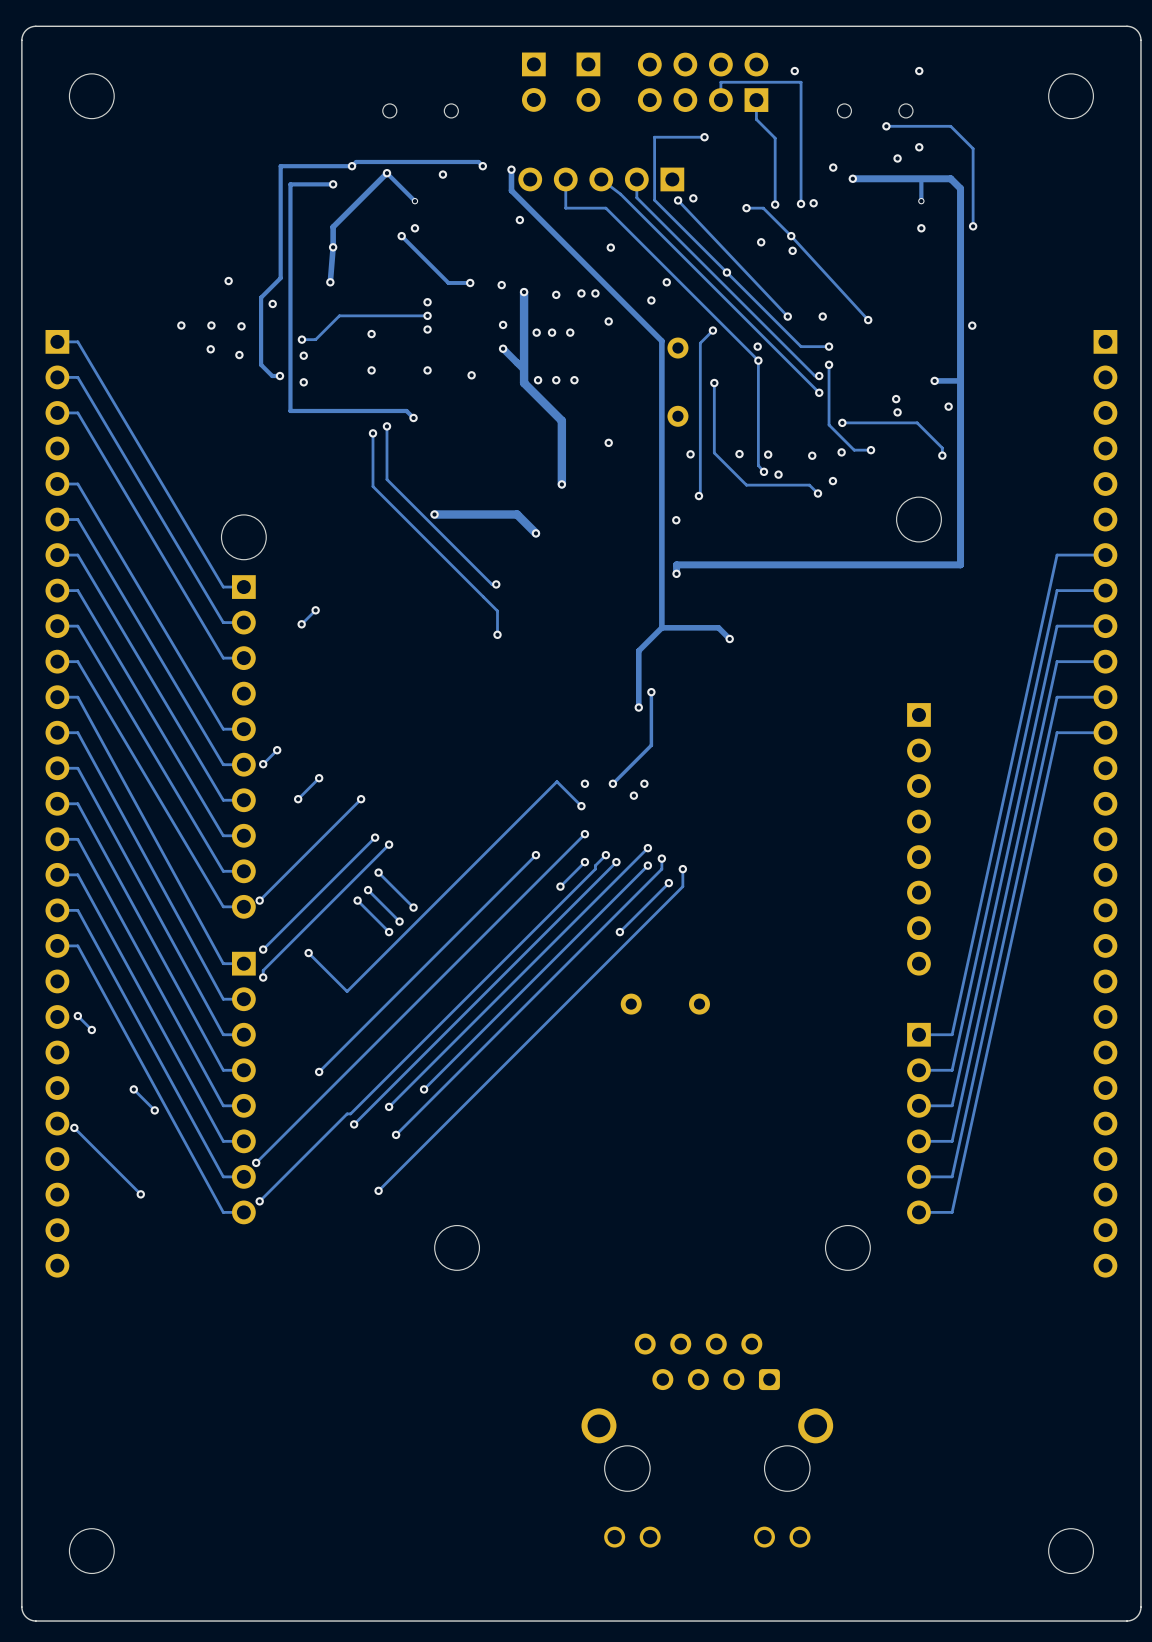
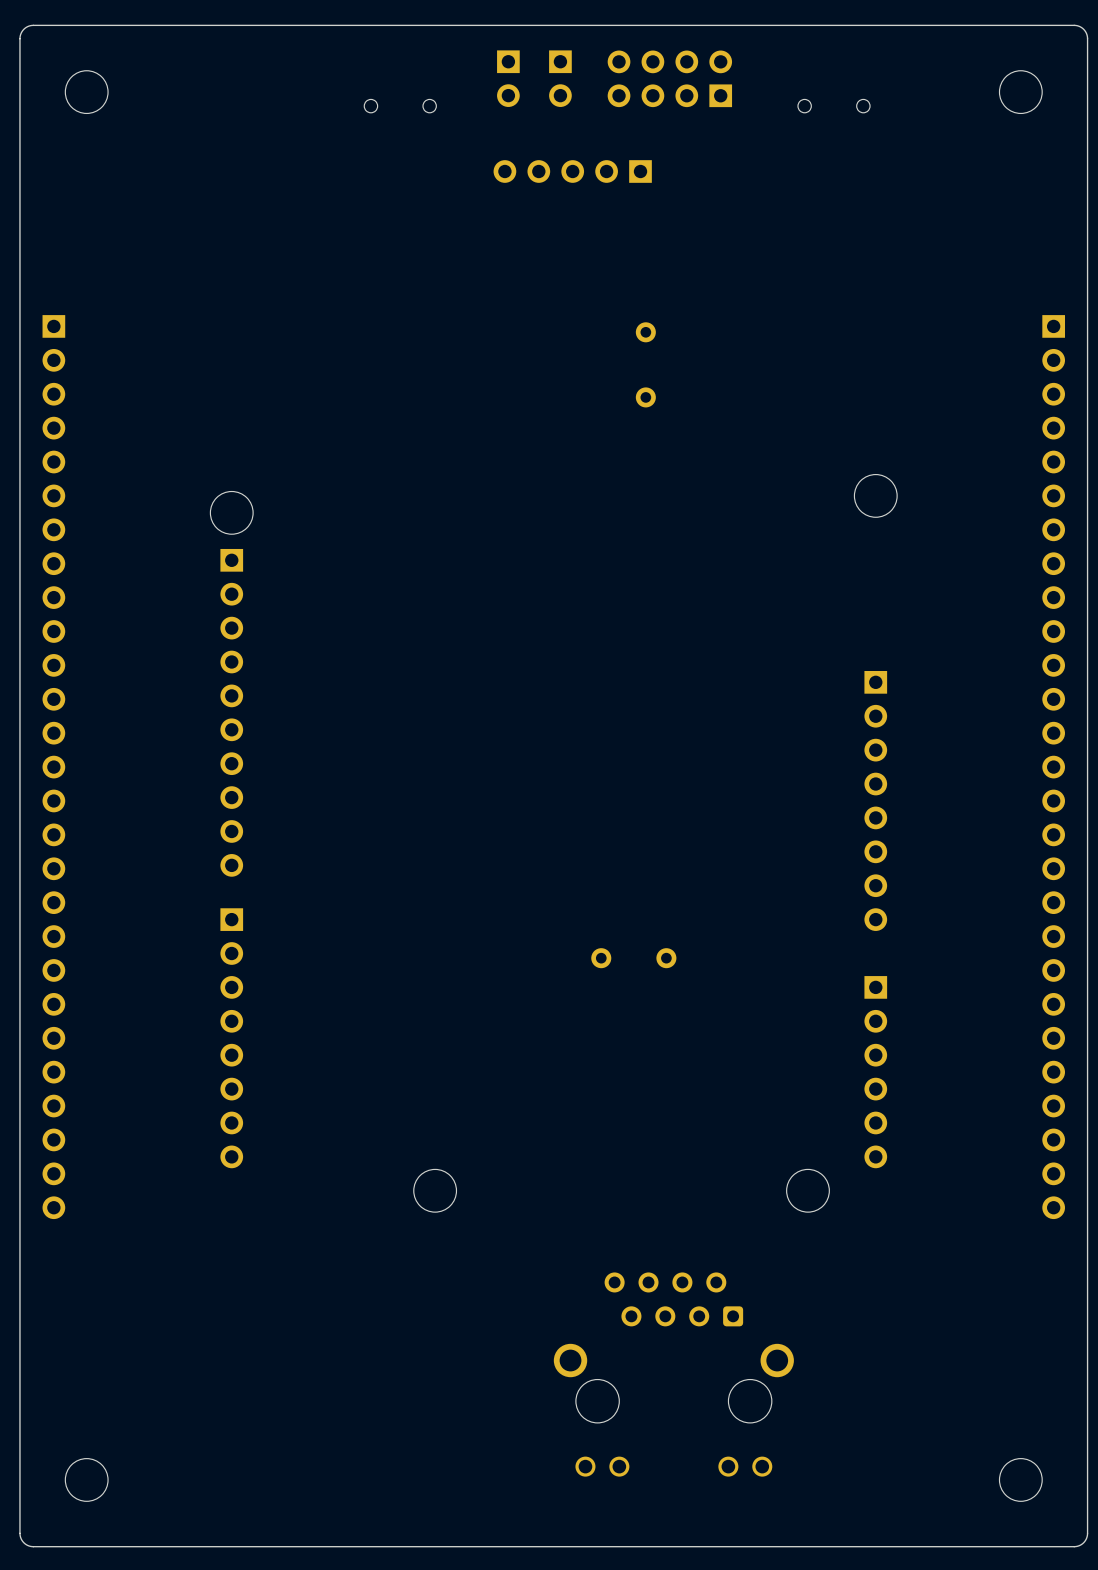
via: (794, 71) -> none
via: (919, 71) -> none
track: (720, 100) (720, 82) (801, 82) (801, 203) -> none
track: (756, 100) (756, 119) (775, 138) (775, 204) -> none
track: (886, 126) (950, 126) (973, 148) (973, 226) -> none
via: (886, 126) -> none
track: (704, 137) (654, 137) (654, 200) (801, 346) (829, 346) -> none
via: (704, 137) -> none
via: (919, 147) -> none
via: (897, 158) -> none
via: (352, 166) -> none
track: (482, 166) (478, 161) (356, 161) (352, 166) (280, 166) (280, 278) (261, 297) (261, 364) (272, 376) (279, 376) -> none
via: (482, 166) -> none
via: (833, 167) -> none
track: (511, 169) (511, 190) (661, 341) (661, 627) -> none
via: (511, 169) -> none
via: (386, 173) -> none
via: (442, 174) -> none
track: (852, 178) (950, 178) (960, 188) (960, 564) (676, 564) (676, 573) -> none
via: (852, 178) -> none
track: (921, 178) (921, 201) -> none
track: (565, 179) (565, 208) (605, 208) (758, 360) (758, 465) (763, 471) -> none
track: (601, 179) (620, 194) (819, 392) -> none
track: (636, 179) (636, 197) (815, 376) (819, 376) -> none
track: (333, 184) (290, 184) (290, 410) (406, 410) (413, 417) -> none
via: (333, 184) -> none
via: (693, 198) -> none
track: (678, 200) (787, 316) -> none
via: (678, 200) -> none
track: (414, 201) (386, 173) (333, 227) (330, 282) -> none
via: (414, 201) -> none
via: (921, 201) -> none
via: (801, 203) -> none
via: (813, 203) -> none
via: (775, 204) -> none
track: (746, 208) (763, 208) (868, 320) -> none
via: (746, 208) -> none
via: (519, 220) -> none
via: (973, 226) -> none
via: (414, 228) -> none
via: (921, 228) -> none
track: (401, 236) (448, 282) (470, 282) -> none
via: (401, 236) -> none
via: (791, 236) -> none
via: (761, 242) -> none
via: (333, 247) -> none
via: (610, 247) -> none
via: (792, 250) -> none
via: (726, 272) -> none
via: (228, 281) -> none
via: (330, 282) -> none
via: (470, 282) -> none
via: (666, 282) -> none
via: (501, 285) -> none
track: (524, 292) (524, 383) (561, 420) (561, 484) -> none
via: (524, 292) -> none
via: (581, 293) -> none
via: (595, 293) -> none
via: (556, 294) -> none
via: (651, 300) -> none
via: (427, 302) -> none
via: (272, 303) -> none
track: (427, 315) (339, 315) (315, 339) (301, 339) -> none
via: (427, 315) -> none
via: (787, 316) -> none
via: (822, 316) -> none
via: (868, 320) -> none
via: (608, 321) -> none
via: (503, 324) -> none
via: (181, 325) -> none
via: (211, 325) -> none
via: (972, 325) -> none
via: (241, 326) -> none
via: (427, 329) -> none
track: (712, 330) (700, 343) (698, 496) -> none
via: (712, 330) -> none
via: (536, 332) -> none
via: (552, 332) -> none
via: (570, 332) -> none
via: (371, 334) -> none
via: (301, 339) -> none
track: (57, 341) (77, 341) (223, 587) (243, 587) -> none
via: (757, 346) -> none
via: (829, 346) -> none
track: (503, 348) (524, 369) -> none
via: (503, 348) -> none
via: (210, 349) -> none
via: (239, 355) -> none
via: (303, 355) -> none
via: (758, 360) -> none
track: (829, 364) (829, 424) (854, 450) (871, 450) -> none
via: (829, 364) -> none
via: (371, 370) -> none
via: (427, 370) -> none
via: (471, 375) -> none
via: (279, 376) -> none
via: (819, 376) -> none
track: (57, 377) (77, 377) (223, 622) (243, 622) -> none
via: (538, 380) -> none
via: (556, 380) -> none
via: (574, 380) -> none
via: (934, 380) -> none
track: (960, 380) (934, 380) -> none
via: (303, 382) -> none
track: (714, 383) (714, 452) (746, 485) (809, 485) (817, 493) -> none
via: (714, 383) -> none
via: (819, 392) -> none
via: (896, 399) -> none
via: (948, 406) -> none
track: (57, 412) (77, 412) (223, 658) (243, 658) -> none
via: (897, 412) -> none
via: (413, 417) -> none
track: (842, 422) (917, 422) (942, 448) (942, 455) -> none
via: (842, 422) -> none
track: (386, 426) (386, 479) (491, 584) (496, 584) -> none
via: (386, 426) -> none
track: (373, 433) (373, 486) (497, 611) (497, 634) -> none
via: (373, 433) -> none
via: (608, 442) -> none
via: (871, 450) -> none
via: (841, 452) -> none
via: (690, 454) -> none
via: (739, 454) -> none
via: (768, 454) -> none
via: (812, 455) -> none
via: (942, 455) -> none
via: (763, 471) -> none
via: (778, 474) -> none
via: (832, 481) -> none
track: (57, 484) (77, 484) (223, 729) (243, 729) -> none
via: (561, 484) -> none
via: (817, 493) -> none
via: (698, 496) -> none
track: (434, 514) (517, 514) (535, 533) -> none
via: (434, 514) -> none
track: (57, 519) (77, 519) (223, 764) (243, 764) -> none
via: (676, 520) -> none
via: (535, 533) -> none
track: (57, 555) (77, 555) (223, 800) (243, 800) -> none
track: (1105, 555) (1057, 555) (952, 1034) (918, 1034) -> none
via: (676, 573) -> none
via: (496, 584) -> none
track: (57, 590) (77, 590) (223, 835) (243, 835) -> none
track: (1105, 590) (1057, 590) (952, 1070) (918, 1070) -> none
track: (315, 610) (301, 624) -> none
via: (315, 610) -> none
via: (301, 624) -> none
track: (57, 626) (77, 626) (223, 871) (243, 871) -> none
track: (1105, 626) (1057, 626) (952, 1105) (918, 1105) -> none
track: (661, 627) (718, 627) (729, 639) -> none
track: (661, 627) (638, 650) (638, 707) -> none
via: (497, 634) -> none
via: (729, 639) -> none
track: (57, 661) (77, 661) (223, 906) (243, 906) -> none
track: (1105, 661) (1057, 661) (952, 1141) (918, 1141) -> none
track: (651, 692) (651, 745) (612, 783) -> none
via: (651, 692) -> none
track: (57, 697) (77, 697) (223, 963) (243, 963) -> none
track: (1105, 697) (1057, 697) (952, 1176) (918, 1176) -> none
via: (638, 707) -> none
track: (57, 732) (77, 732) (223, 999) (243, 999) -> none
track: (1105, 732) (1057, 732) (952, 1212) (918, 1212) -> none
track: (277, 750) (263, 764) -> none
via: (277, 750) -> none
via: (263, 764) -> none
track: (57, 768) (77, 768) (223, 1034) (243, 1034) -> none
track: (319, 778) (298, 799) -> none
via: (319, 778) -> none
via: (584, 783) -> none
via: (612, 783) -> none
via: (644, 783) -> none
via: (633, 795) -> none
via: (298, 799) -> none
track: (361, 799) (259, 900) -> none
via: (361, 799) -> none
track: (57, 803) (77, 803) (223, 1070) (243, 1070) -> none
track: (581, 806) (556, 781) (347, 991) (308, 953) -> none
via: (581, 806) -> none
track: (584, 834) (256, 1162) -> none
via: (584, 834) -> none
track: (375, 837) (263, 949) -> none
via: (375, 837) -> none
track: (57, 839) (77, 839) (223, 1105) (243, 1105) -> none
track: (389, 844) (263, 970) (263, 977) -> none
via: (389, 844) -> none
track: (647, 848) (389, 1106) -> none
via: (647, 848) -> none
track: (535, 855) (319, 1071) -> none
via: (535, 855) -> none
track: (605, 855) (595, 865) (595, 869) (350, 1113) (347, 1113) (259, 1201) -> none
via: (605, 855) -> none
track: (661, 858) (661, 869) (396, 1134) -> none
via: (661, 858) -> none
track: (584, 862) (560, 886) -> none
via: (584, 862) -> none
track: (616, 862) (354, 1124) -> none
via: (616, 862) -> none
track: (647, 865) (424, 1089) -> none
via: (647, 865) -> none
track: (682, 869) (682, 886) (378, 1190) -> none
via: (682, 869) -> none
track: (378, 872) (413, 907) -> none
via: (378, 872) -> none
track: (57, 874) (77, 874) (223, 1141) (243, 1141) -> none
track: (668, 883) (619, 932) -> none
via: (668, 883) -> none
via: (560, 886) -> none
track: (368, 890) (399, 921) -> none
via: (368, 890) -> none
via: (259, 900) -> none
track: (357, 900) (389, 932) -> none
via: (357, 900) -> none
via: (413, 907) -> none
track: (57, 910) (77, 910) (223, 1176) (243, 1176) -> none
via: (399, 921) -> none
via: (389, 932) -> none
via: (619, 932) -> none
track: (57, 945) (77, 945) (223, 1212) (243, 1212) -> none
via: (263, 949) -> none
via: (308, 953) -> none
via: (263, 977) -> none
track: (77, 1016) (91, 1029) -> none
via: (77, 1016) -> none
via: (91, 1029) -> none
via: (319, 1071) -> none
track: (133, 1089) (154, 1110) -> none
via: (133, 1089) -> none
via: (424, 1089) -> none
via: (389, 1106) -> none
via: (154, 1110) -> none
via: (354, 1124) -> none
track: (74, 1127) (140, 1194) -> none
via: (74, 1127) -> none
via: (396, 1134) -> none
via: (256, 1162) -> none
via: (378, 1190) -> none
via: (140, 1194) -> none
via: (259, 1201) -> none

